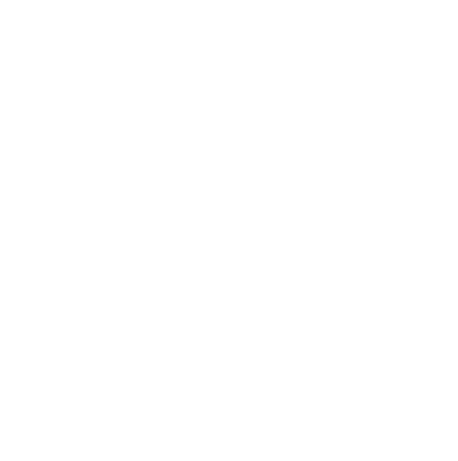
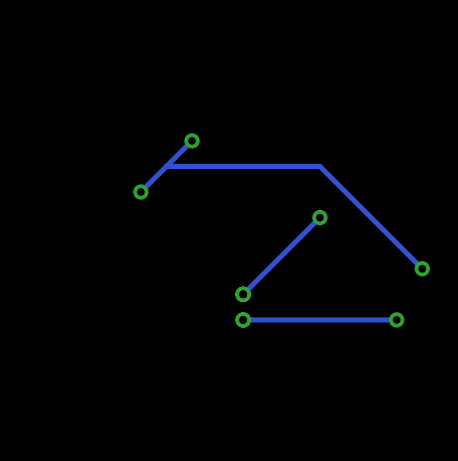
track: none -> (192, 140) (140, 192)
via: none -> (192, 140)
track: none -> (166, 166) (319, 166) (422, 268)
via: none -> (140, 192)
track: none -> (319, 217) (243, 294)
via: none -> (319, 217)
via: none -> (422, 268)
via: none -> (243, 294)
via: none -> (243, 319)
track: none -> (396, 319) (243, 319)
via: none -> (396, 319)

